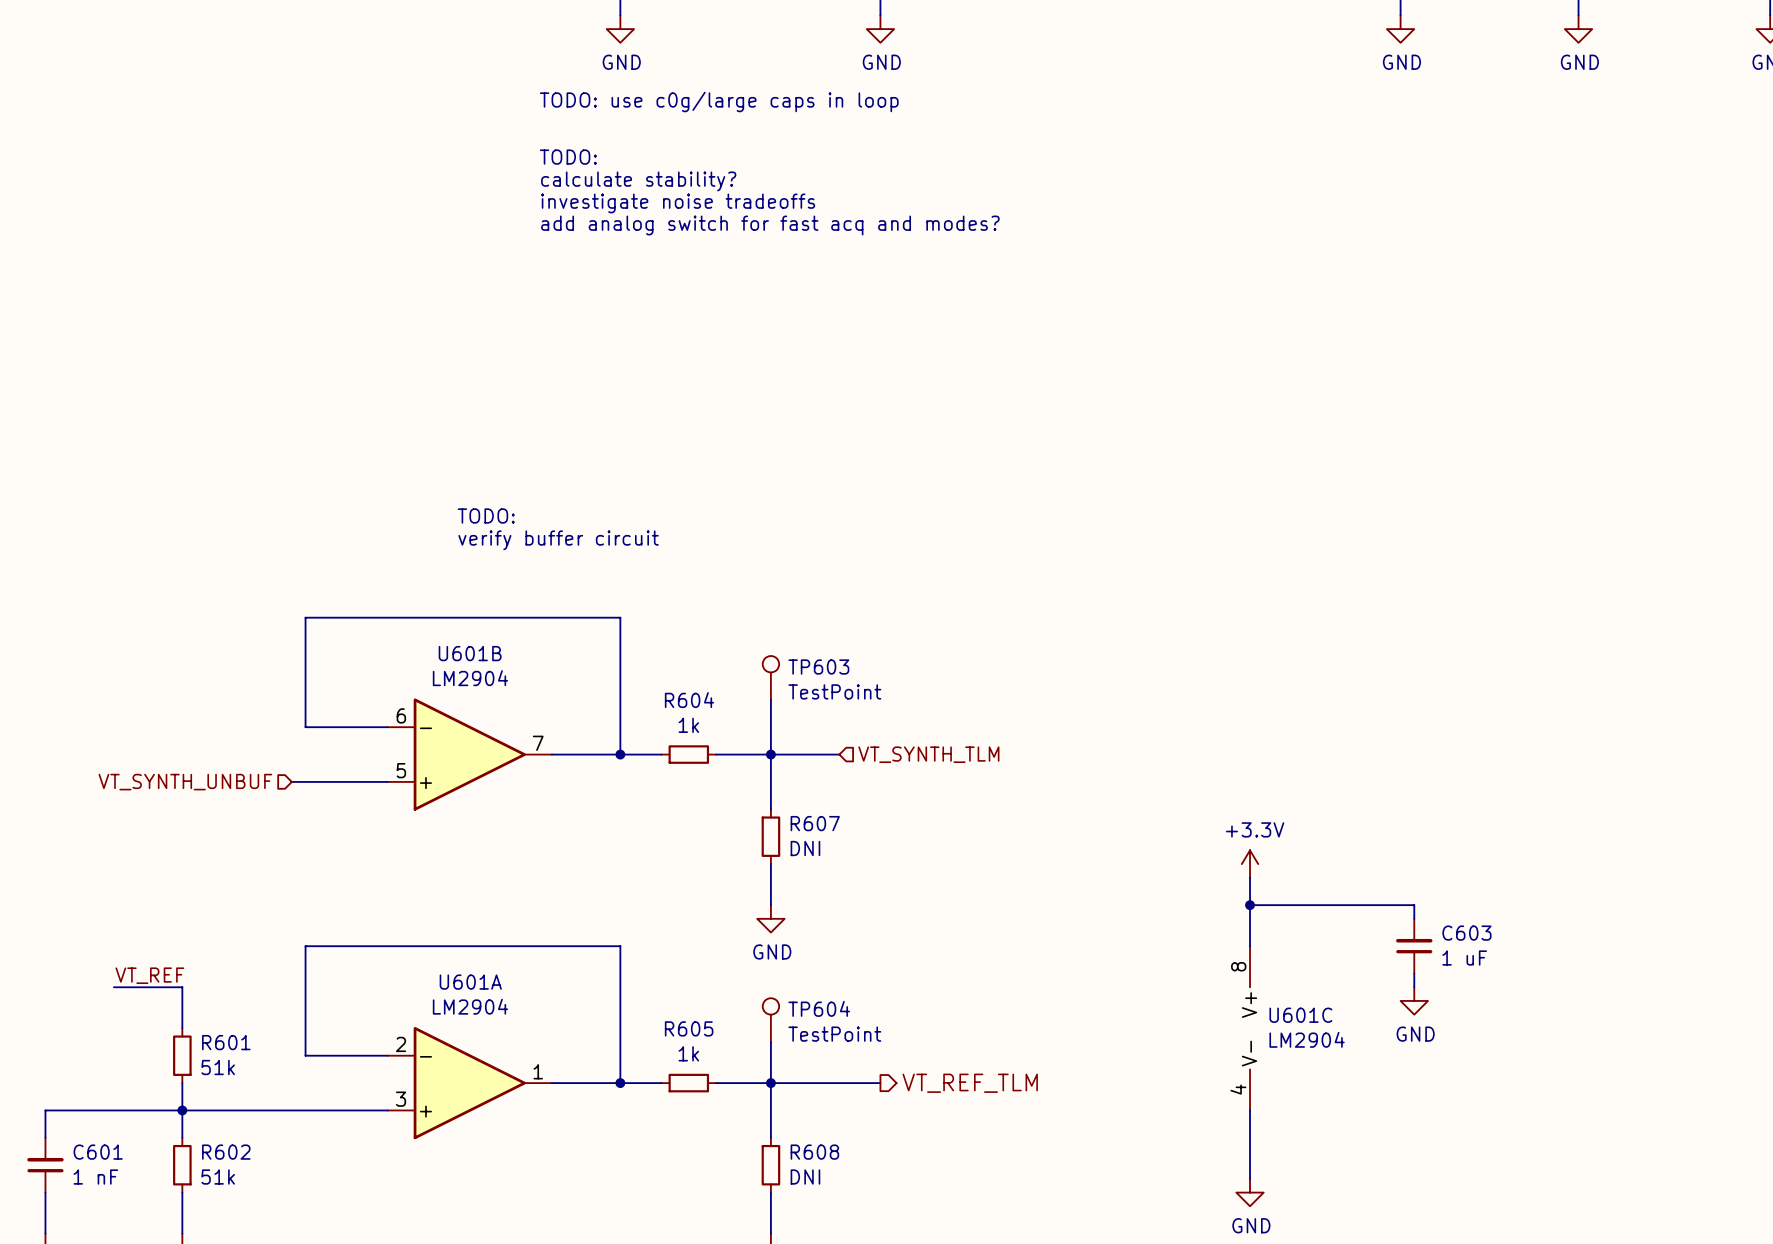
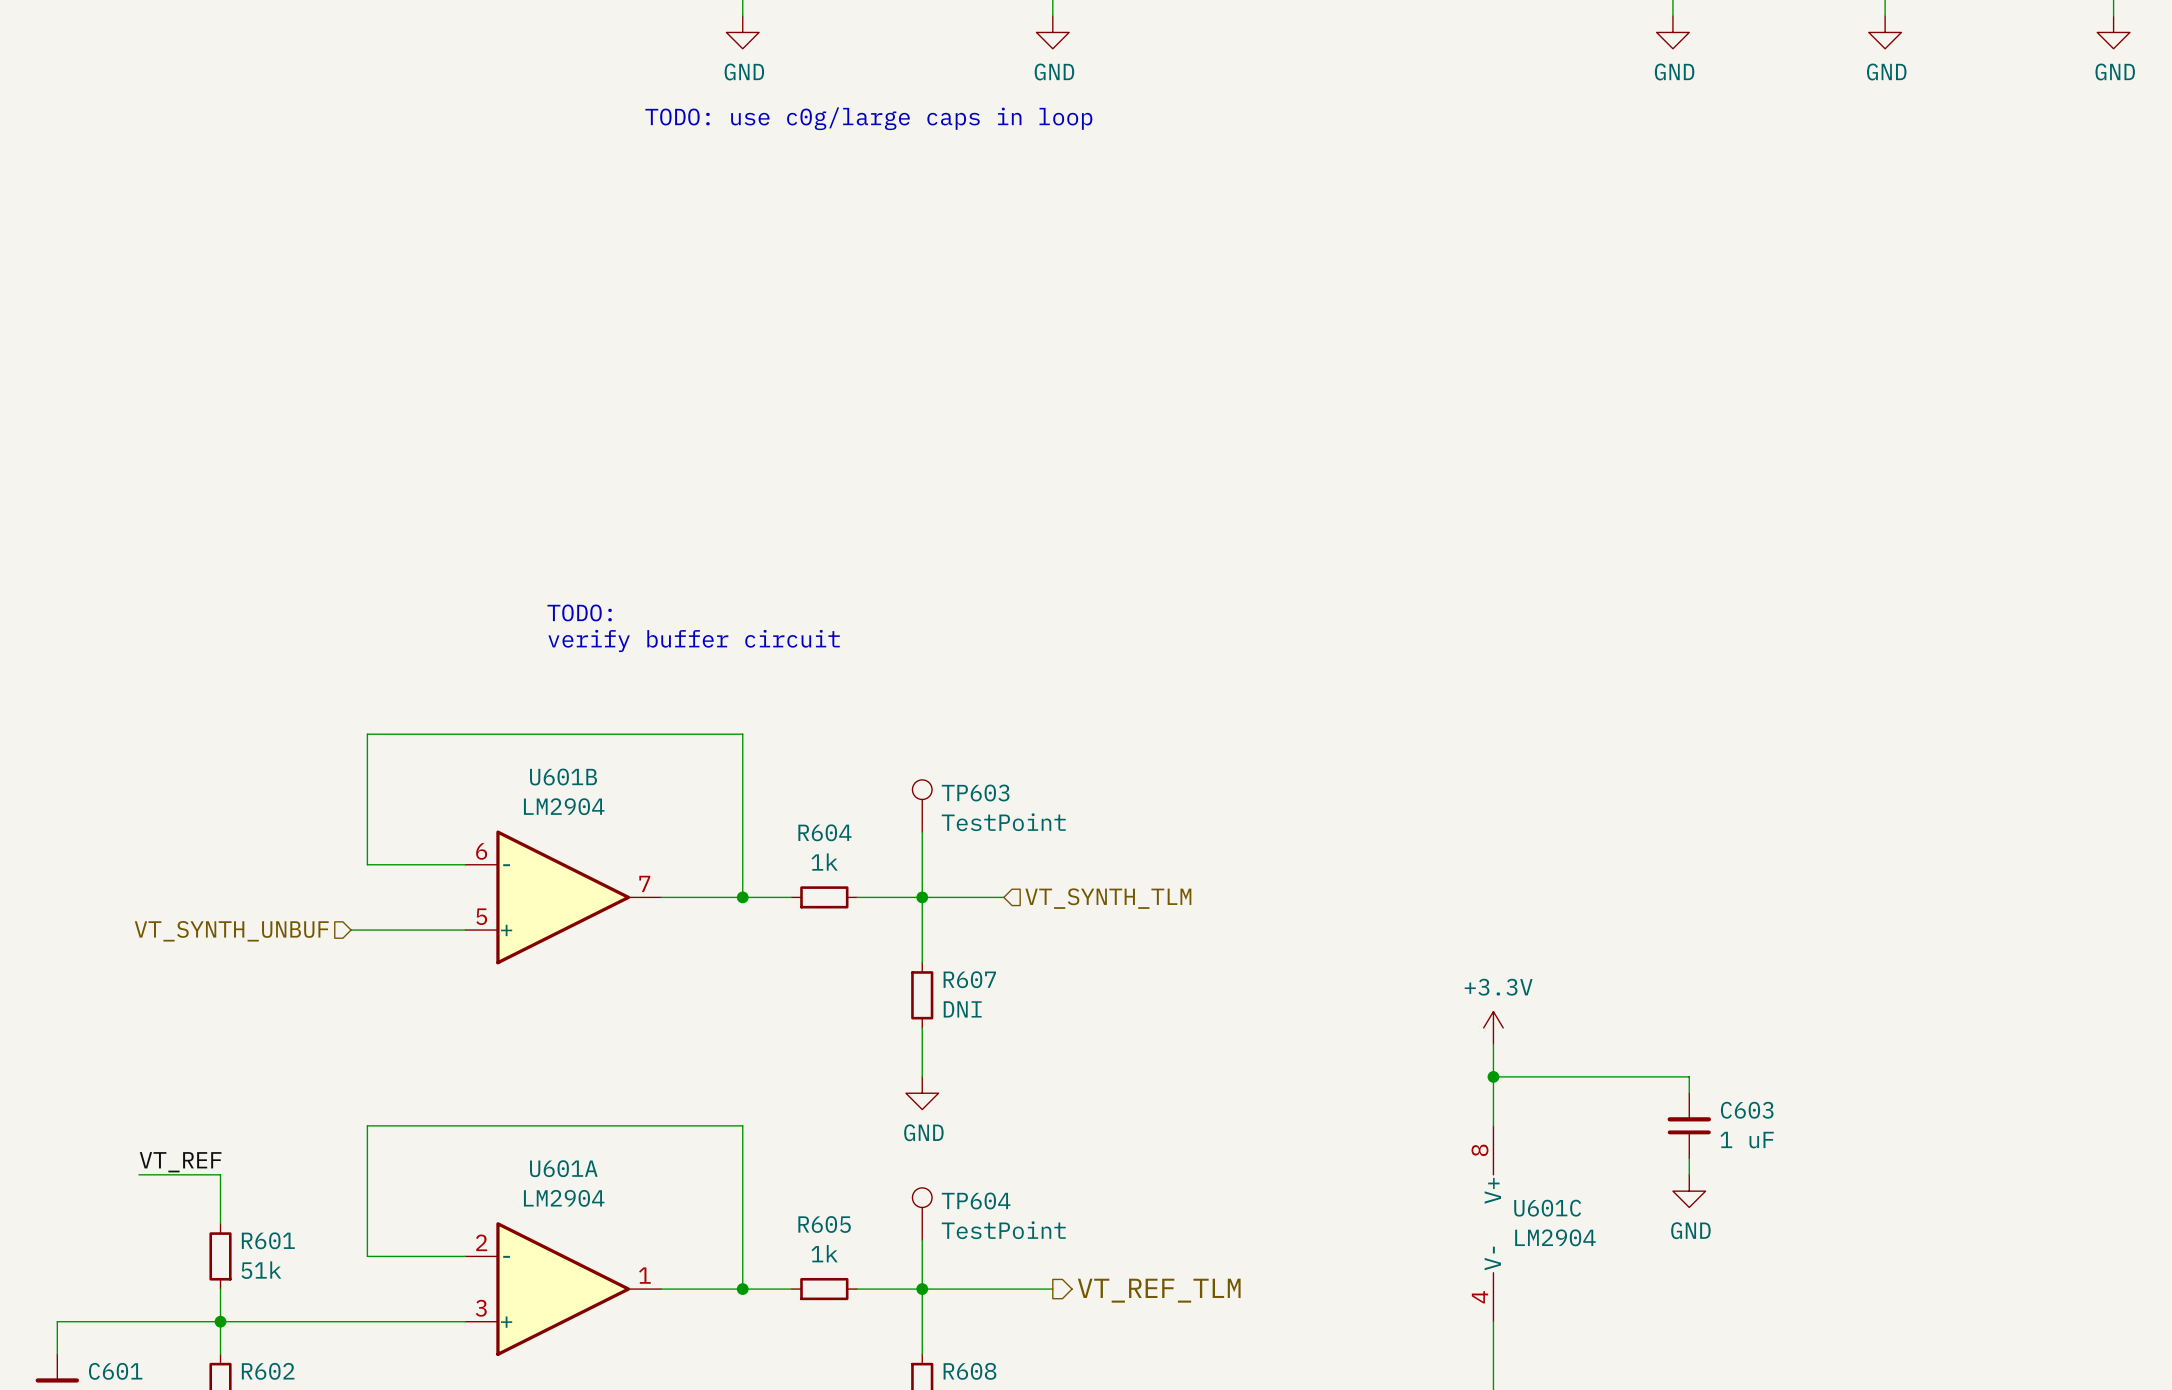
text: TODO: (568, 157) -> none
text: calculate stability? (638, 181) -> none
text: investigate noise tradeoffs (678, 203) -> none
text: add analog switch for fast acq and modes? (770, 225) -> none

